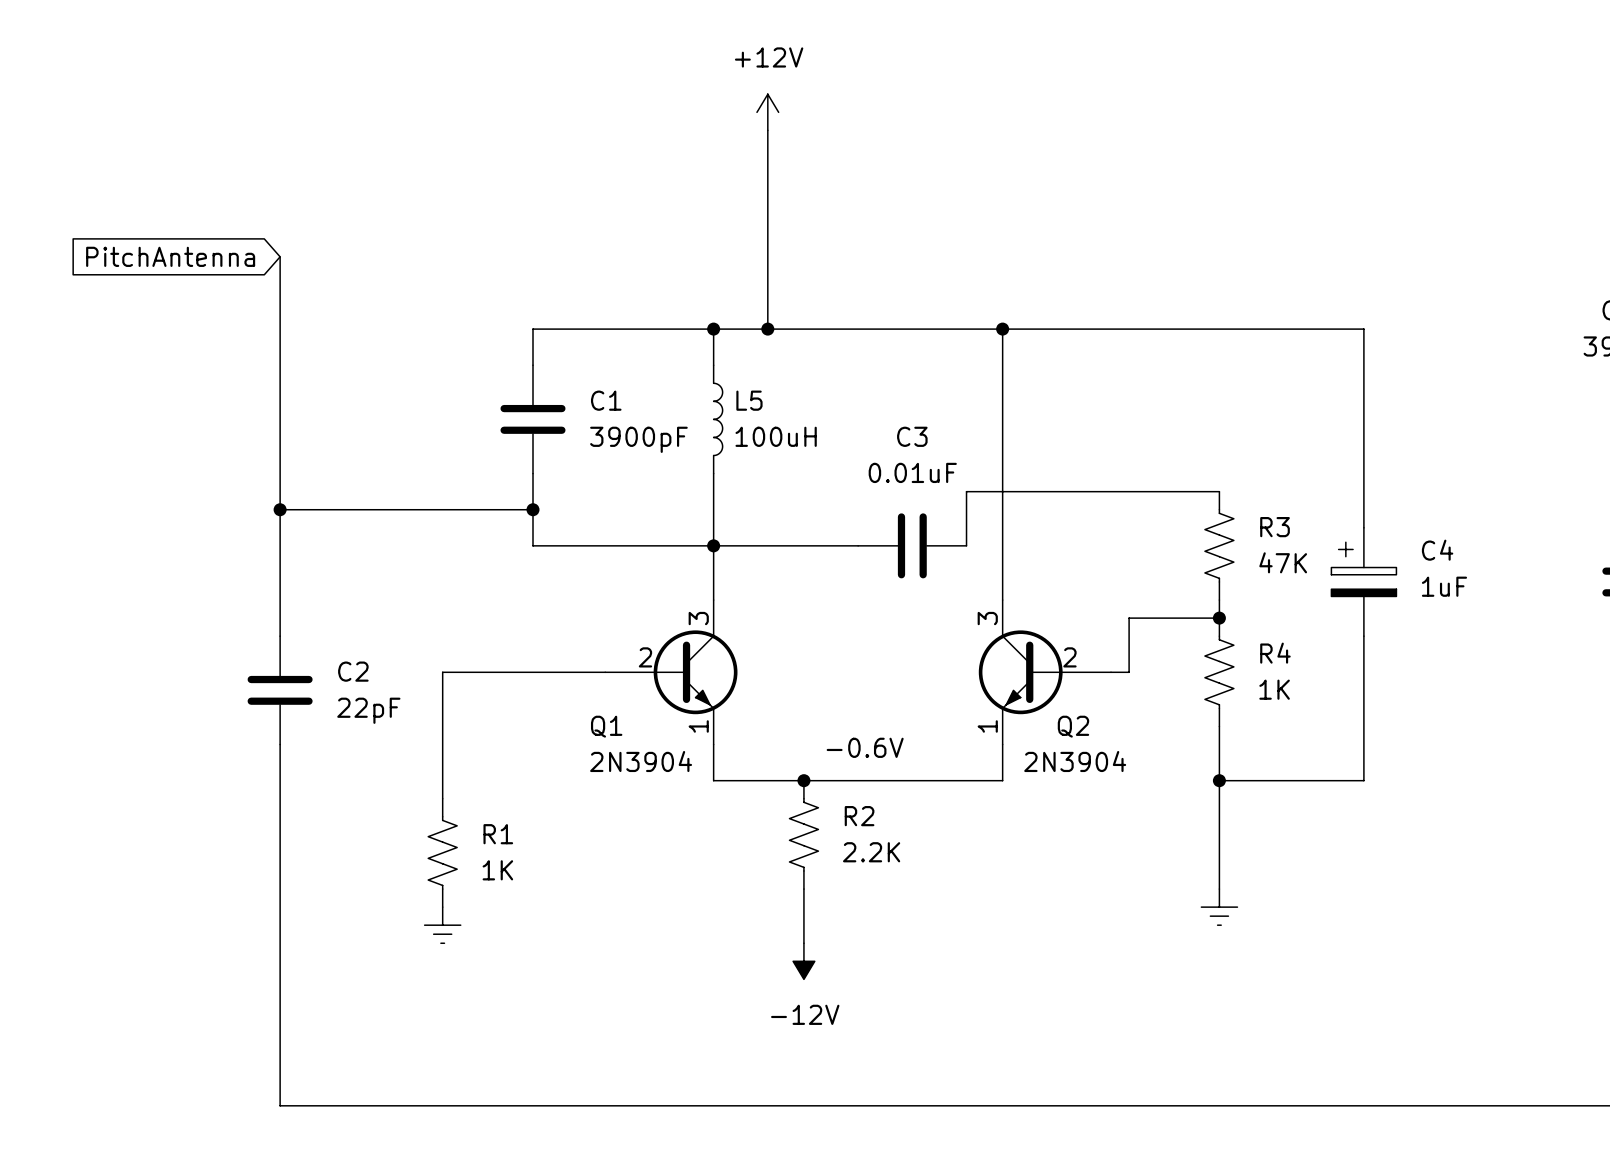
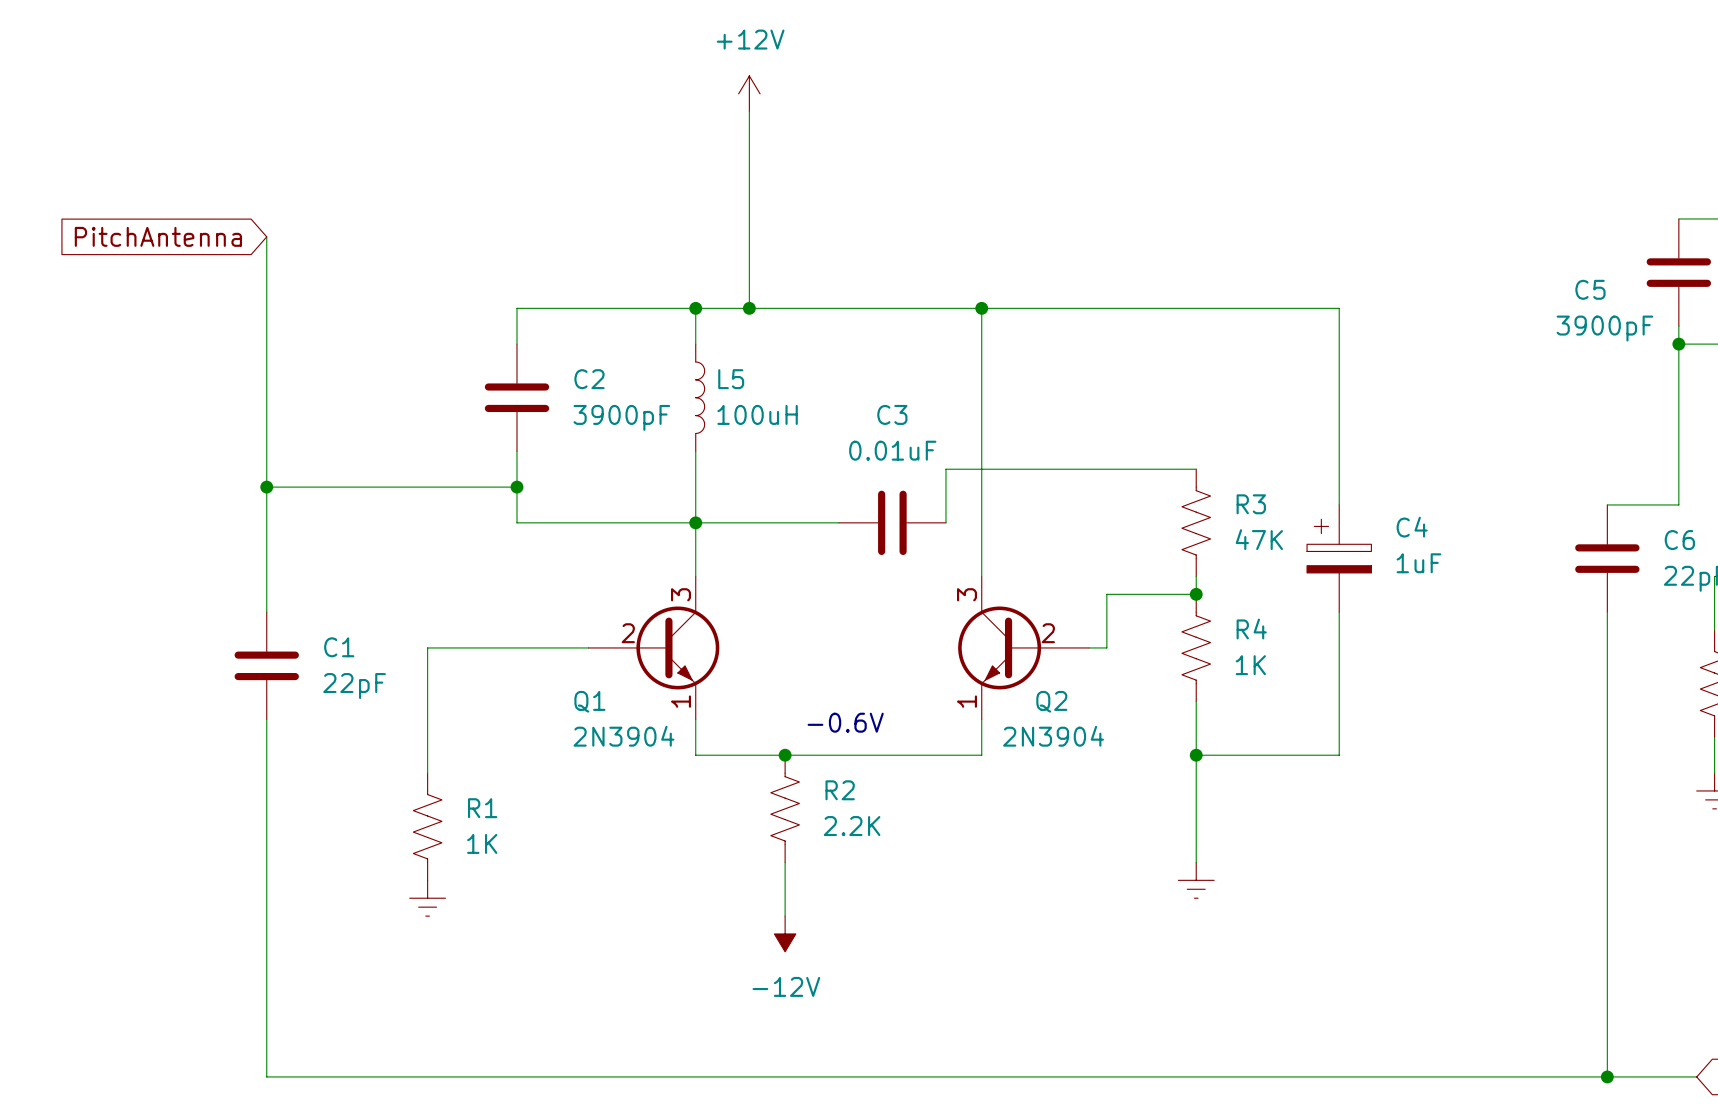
C1 name: C1 (606, 400) -> C2 (589, 379)
C2 name: C2 (353, 671) -> C1 (339, 647)

